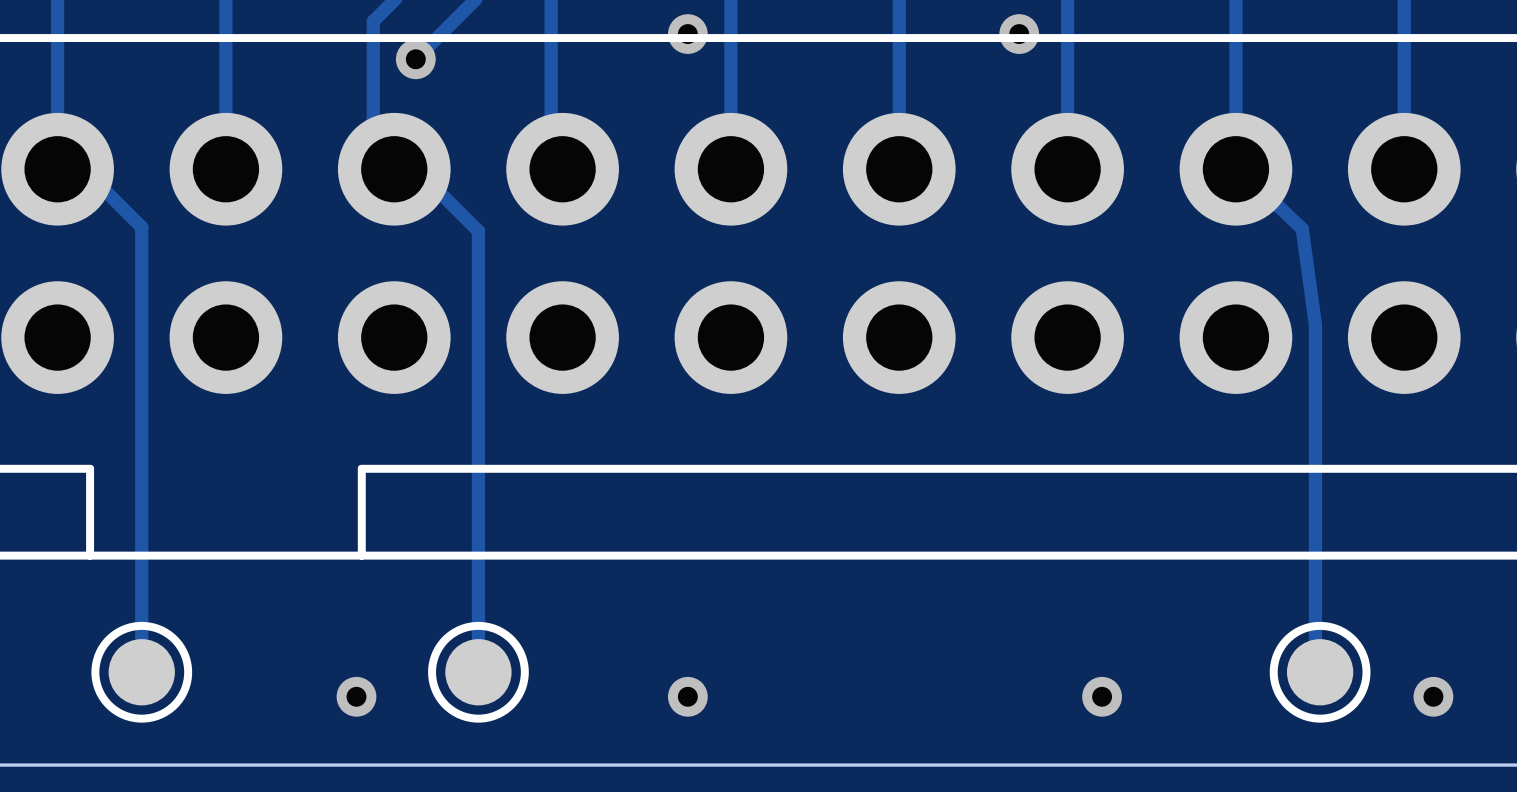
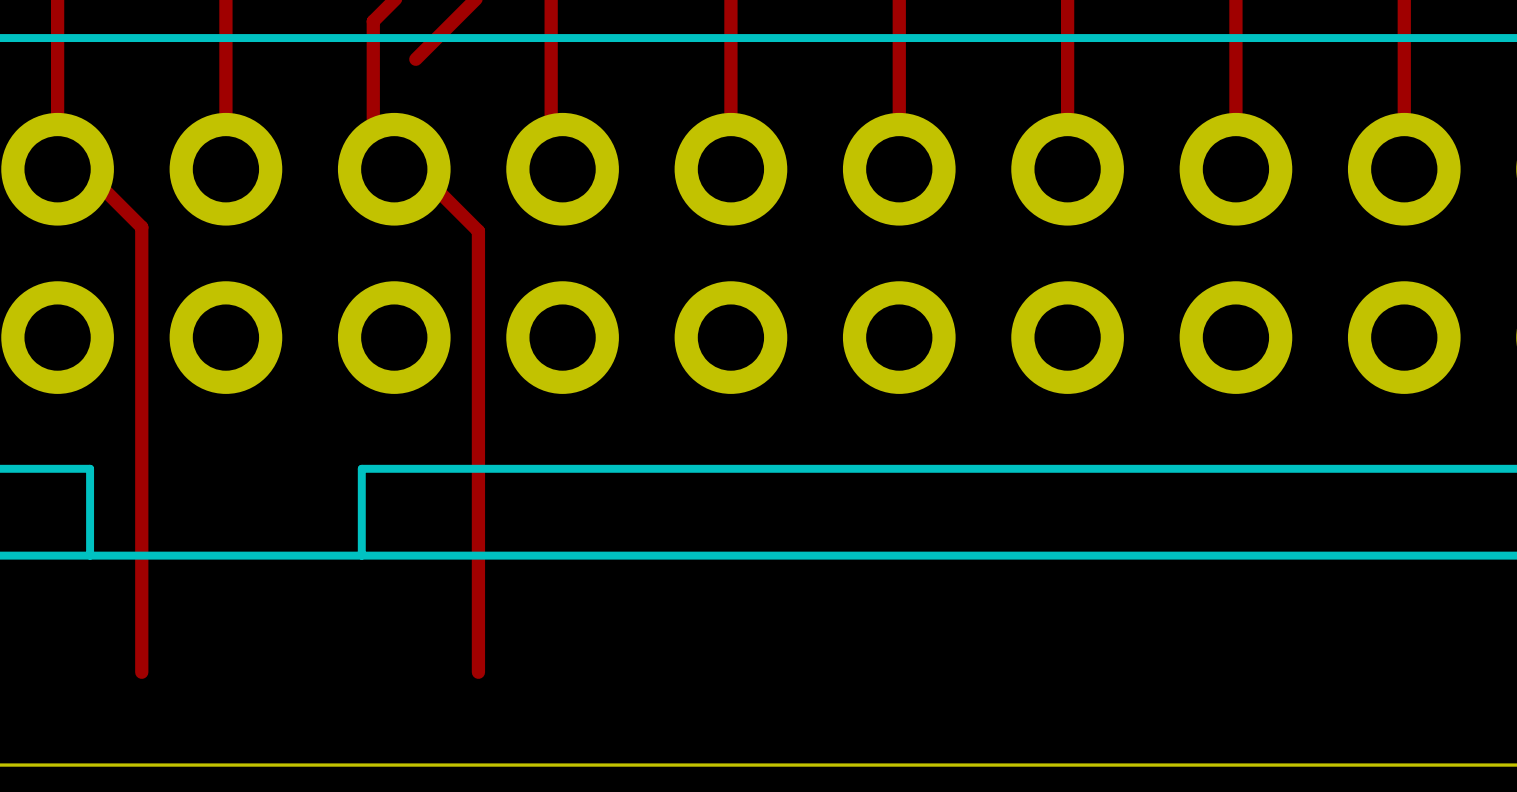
via: (687, 34) -> none
via: (1019, 34) -> none
via: (415, 59) -> none
track: (1235, 165) (1302, 228) (1315, 324) (1315, 669) (1320, 672) -> none
part: (141, 672) -> none
part: (478, 672) -> none
part: (1320, 672) -> none
via: (356, 696) -> none
via: (687, 696) -> none
via: (1102, 696) -> none
via: (1433, 696) -> none

